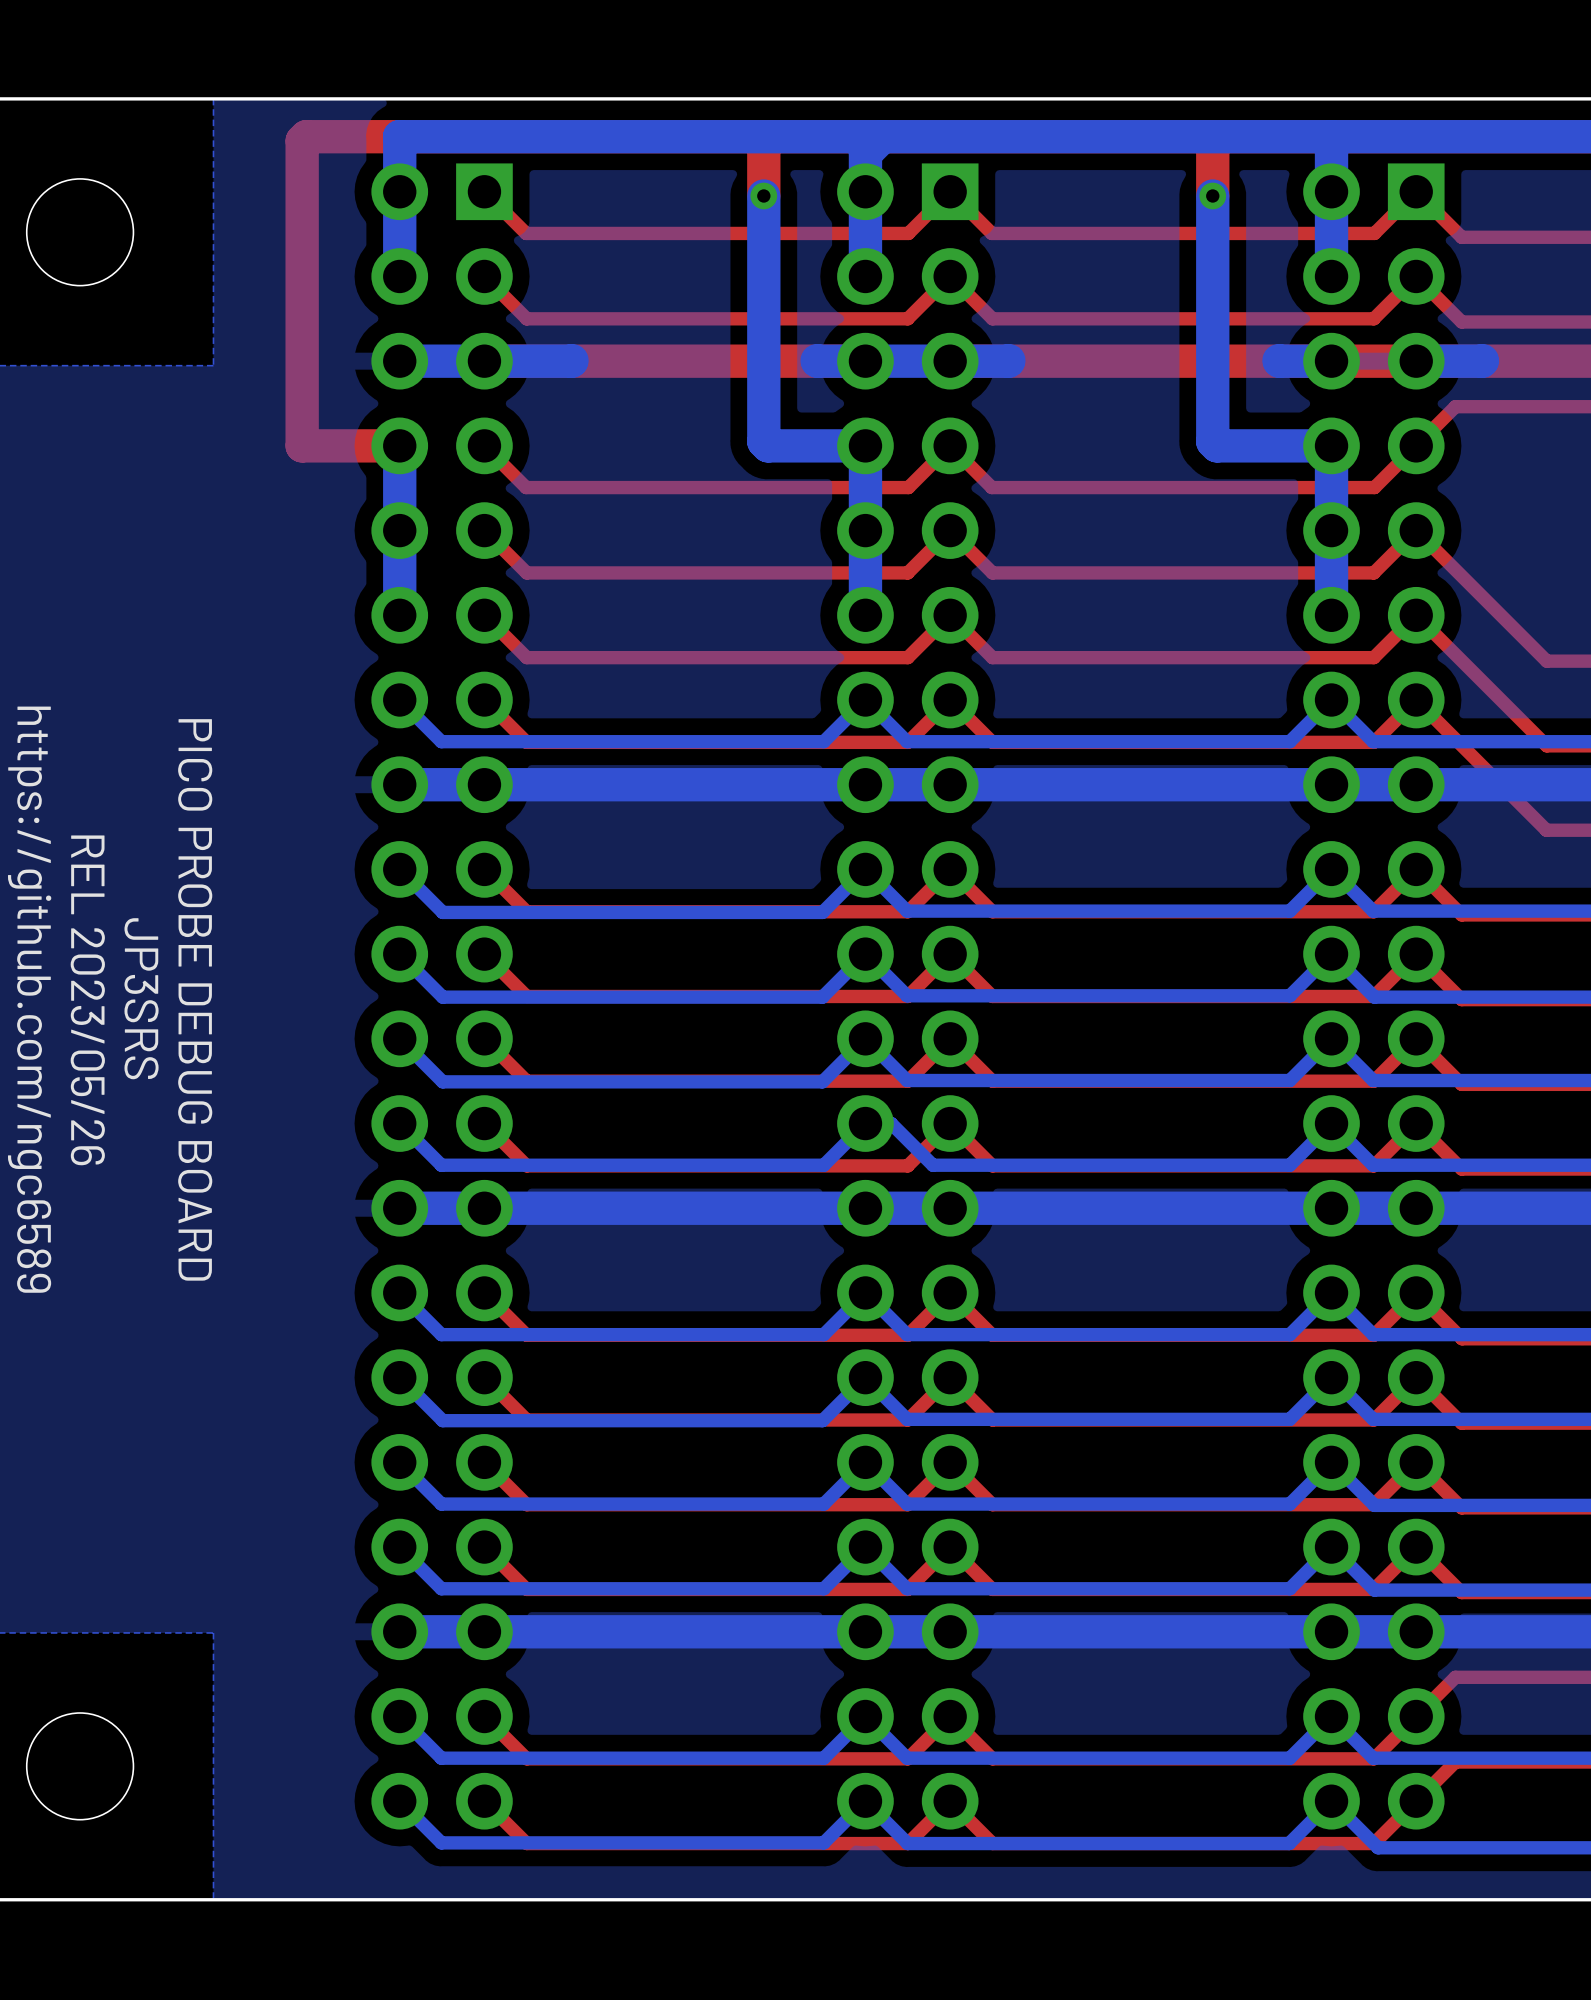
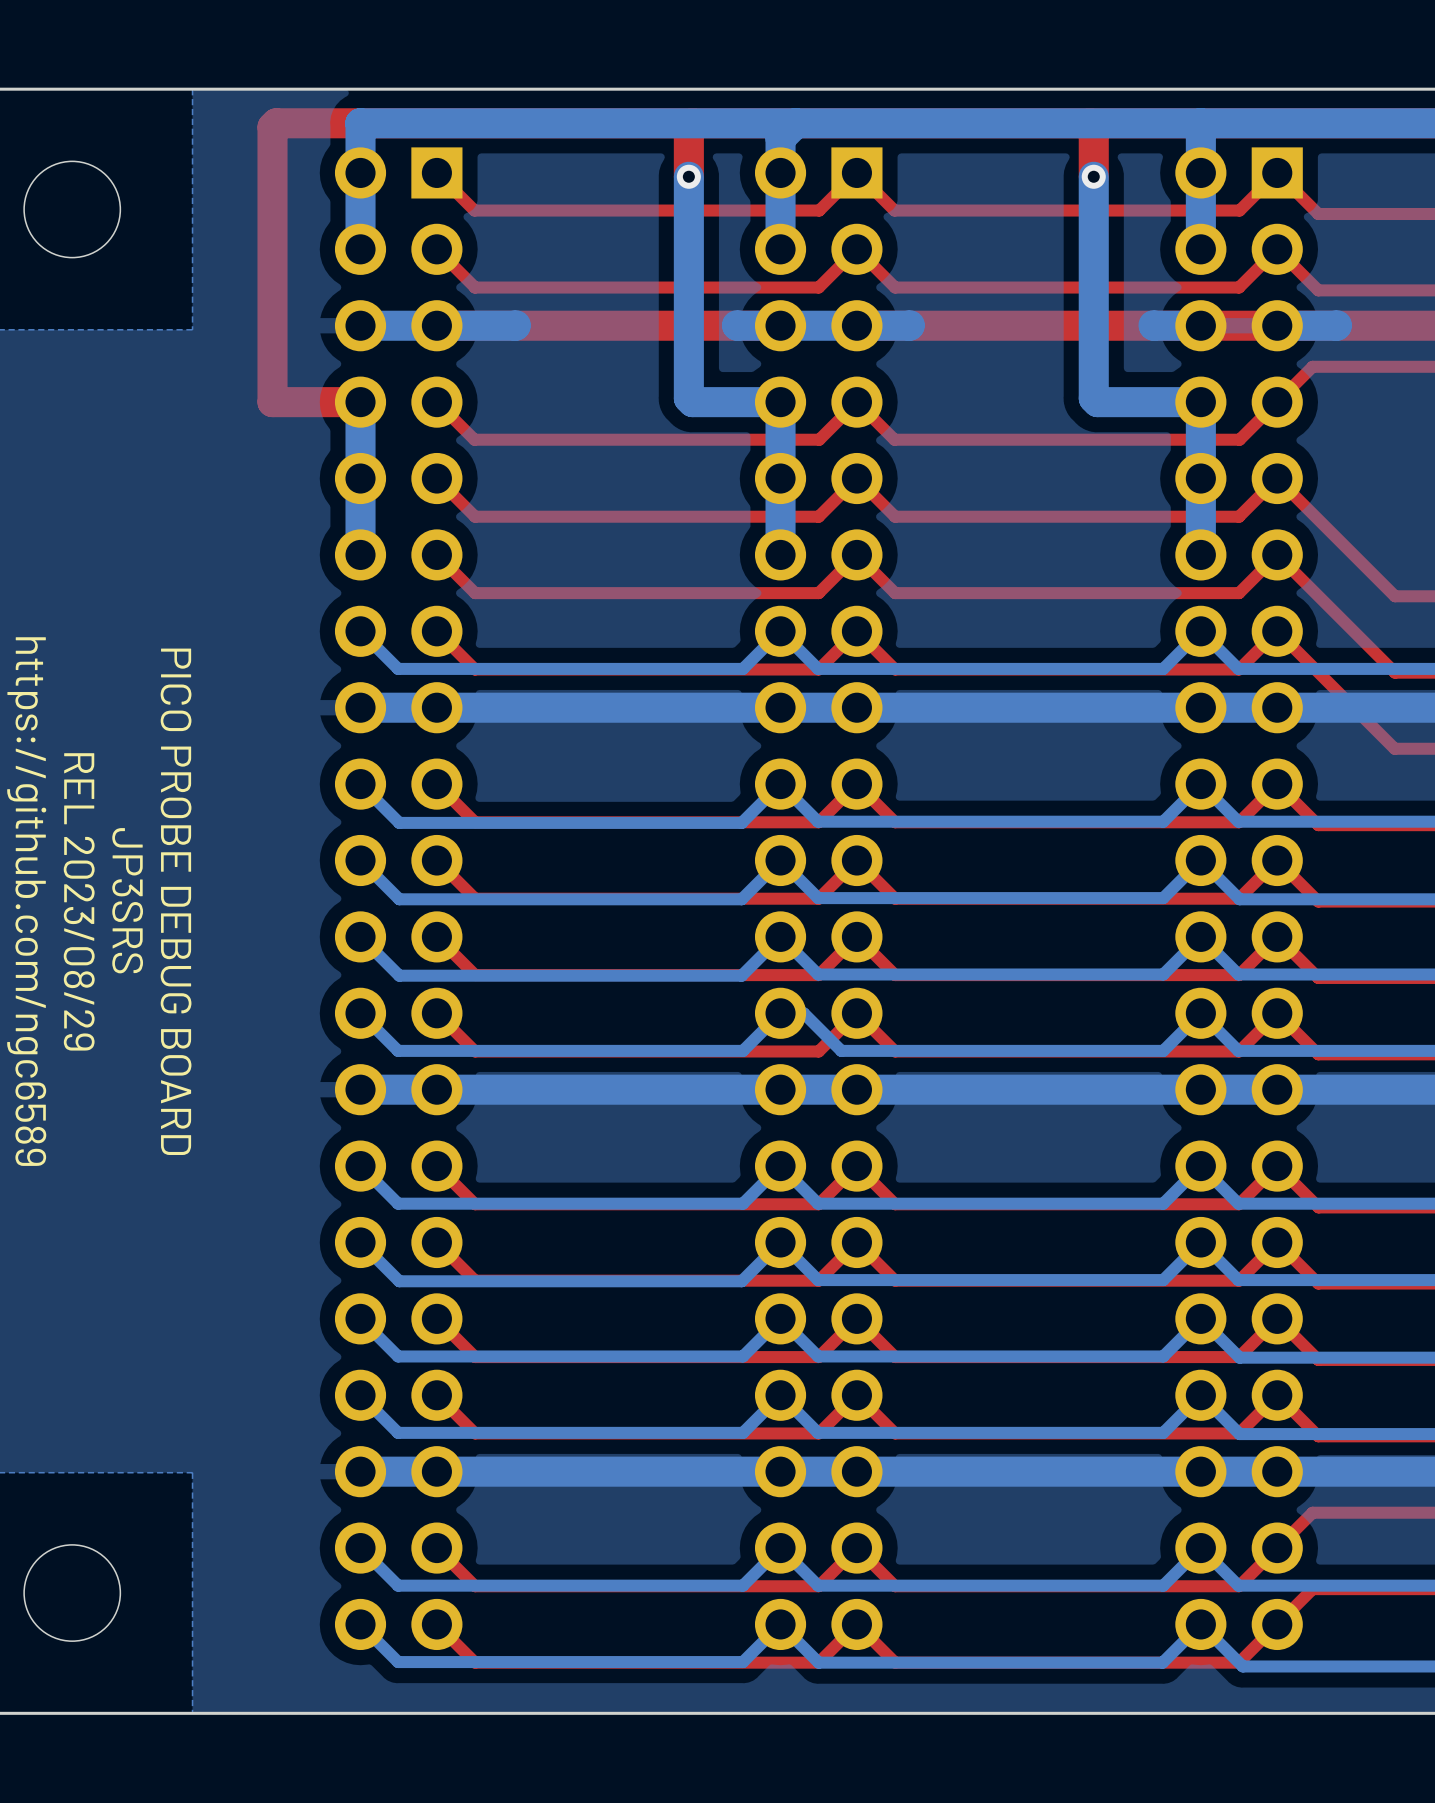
text: REL 2023/05/26 (87, 1000) -> REL 2023/08/29 (79, 901)

